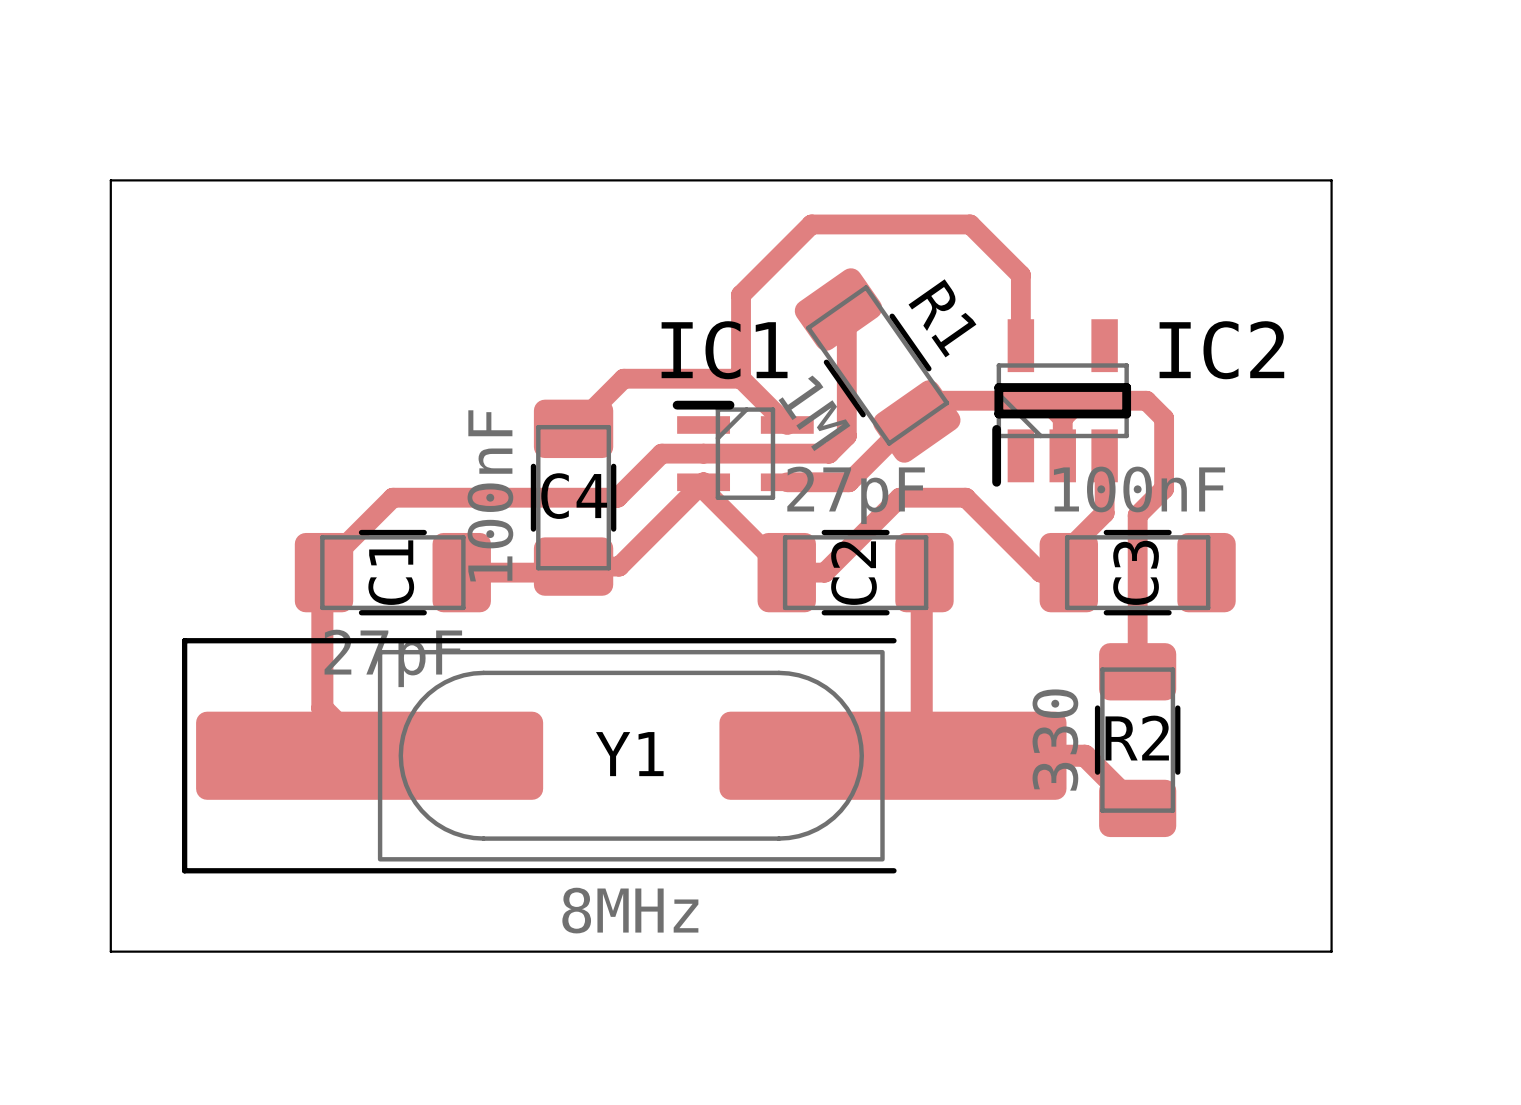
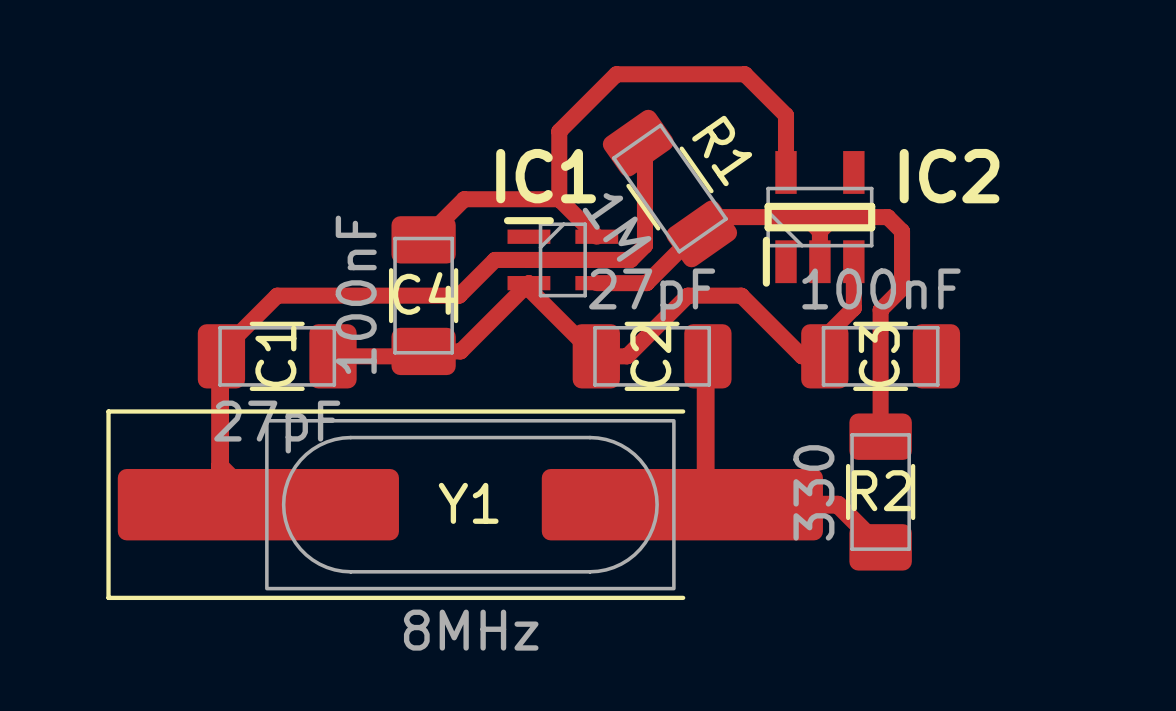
board edge: (110, 180) (1331, 180) (1331, 951) (110, 951) (110, 180) -> none

